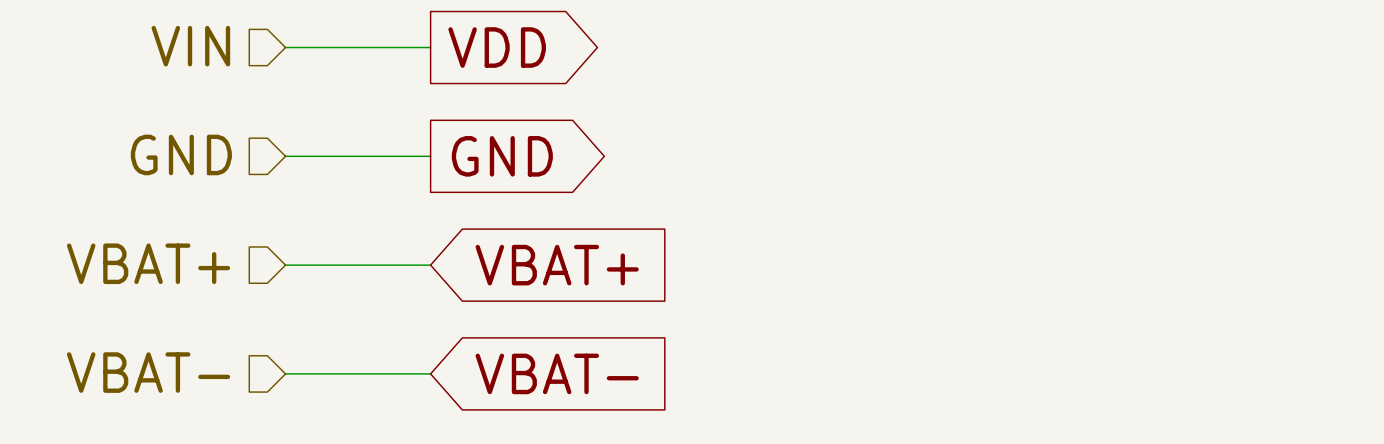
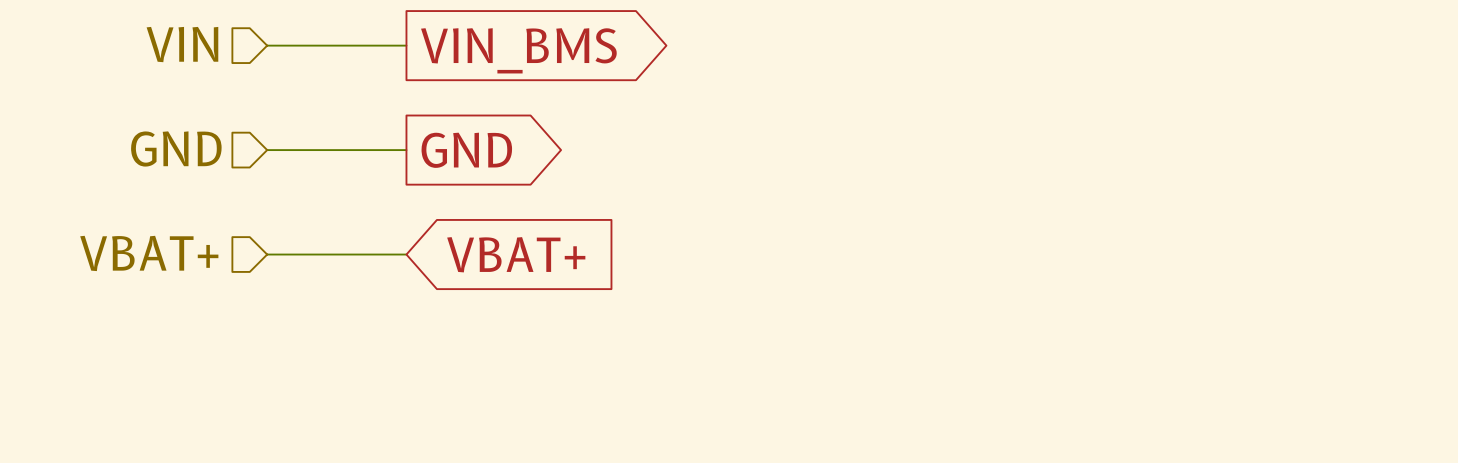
global label: VDD (497, 47) -> VIN_BMS (518, 50)
hierarchical label: VBAT- (148, 372) -> none
wire: (285, 373) (430, 373) -> none
global label: VBAT- (557, 373) -> none

